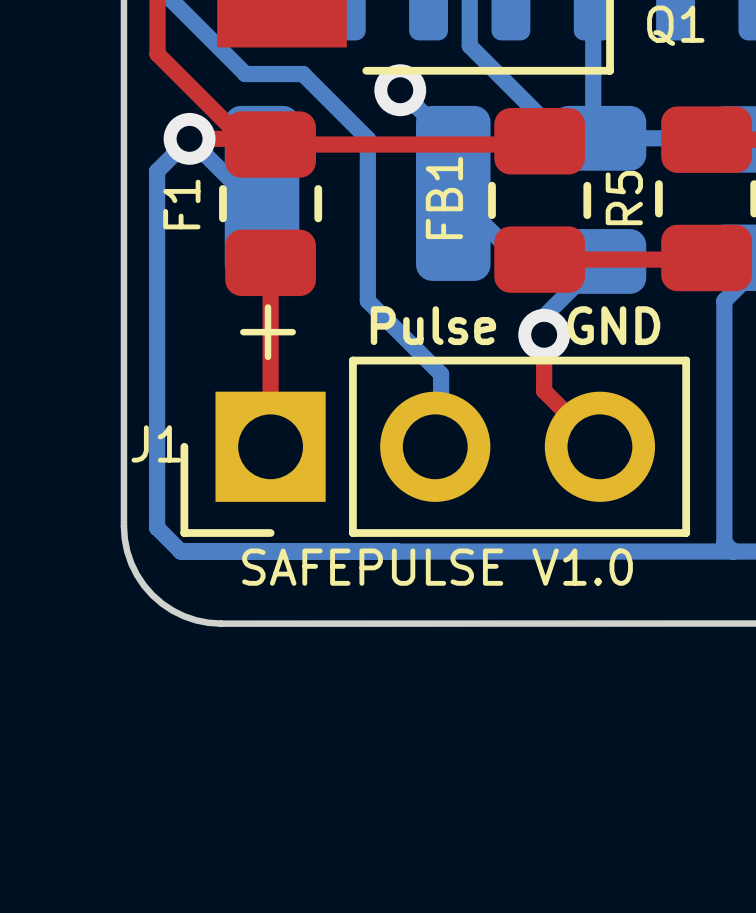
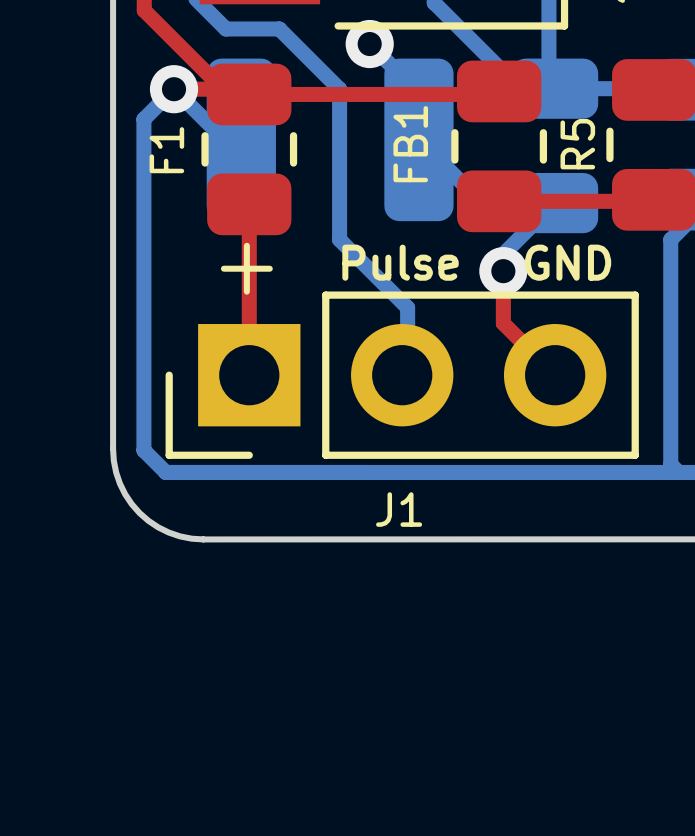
J1 name position: J1 (156, 443) -> J1 (399, 509)
text: SAFEPULSE V1.0 (437, 567) -> none

